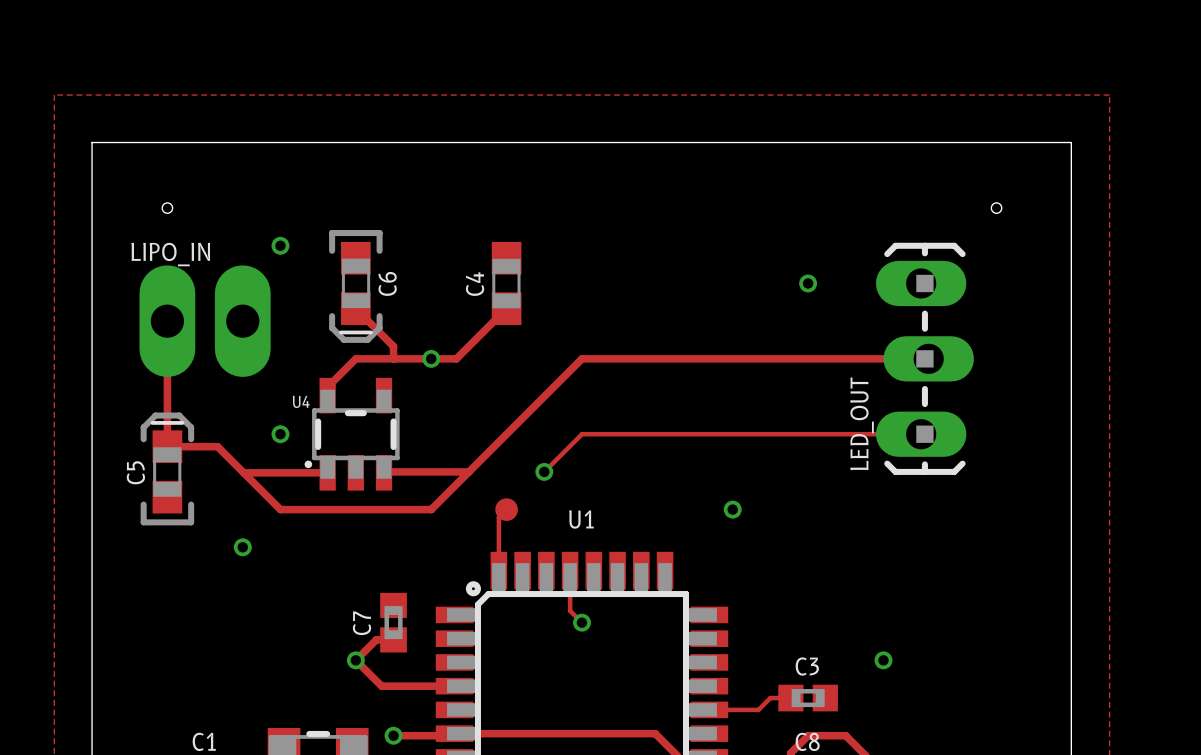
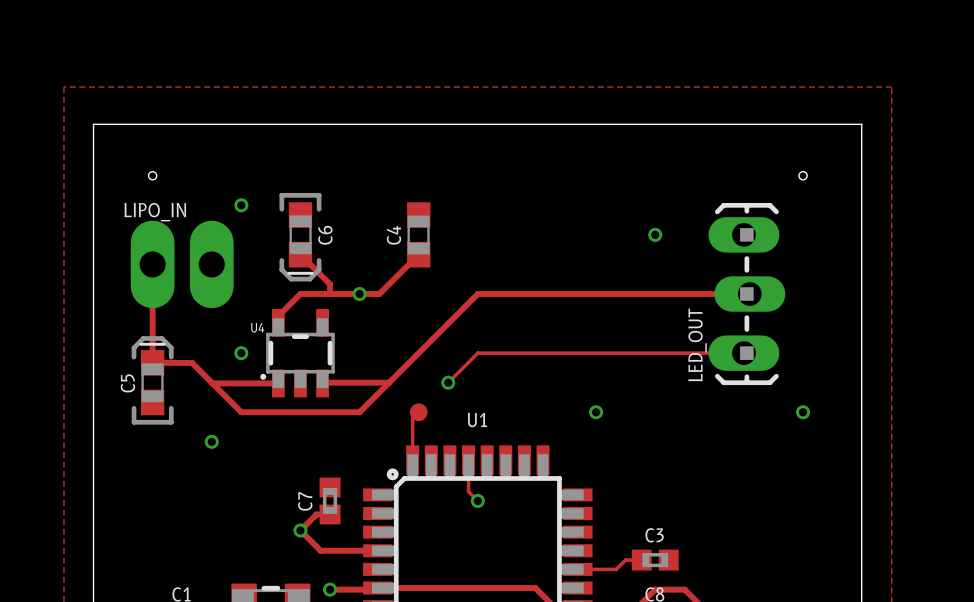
via: none -> (803, 412)
via: (883, 660) -> none

